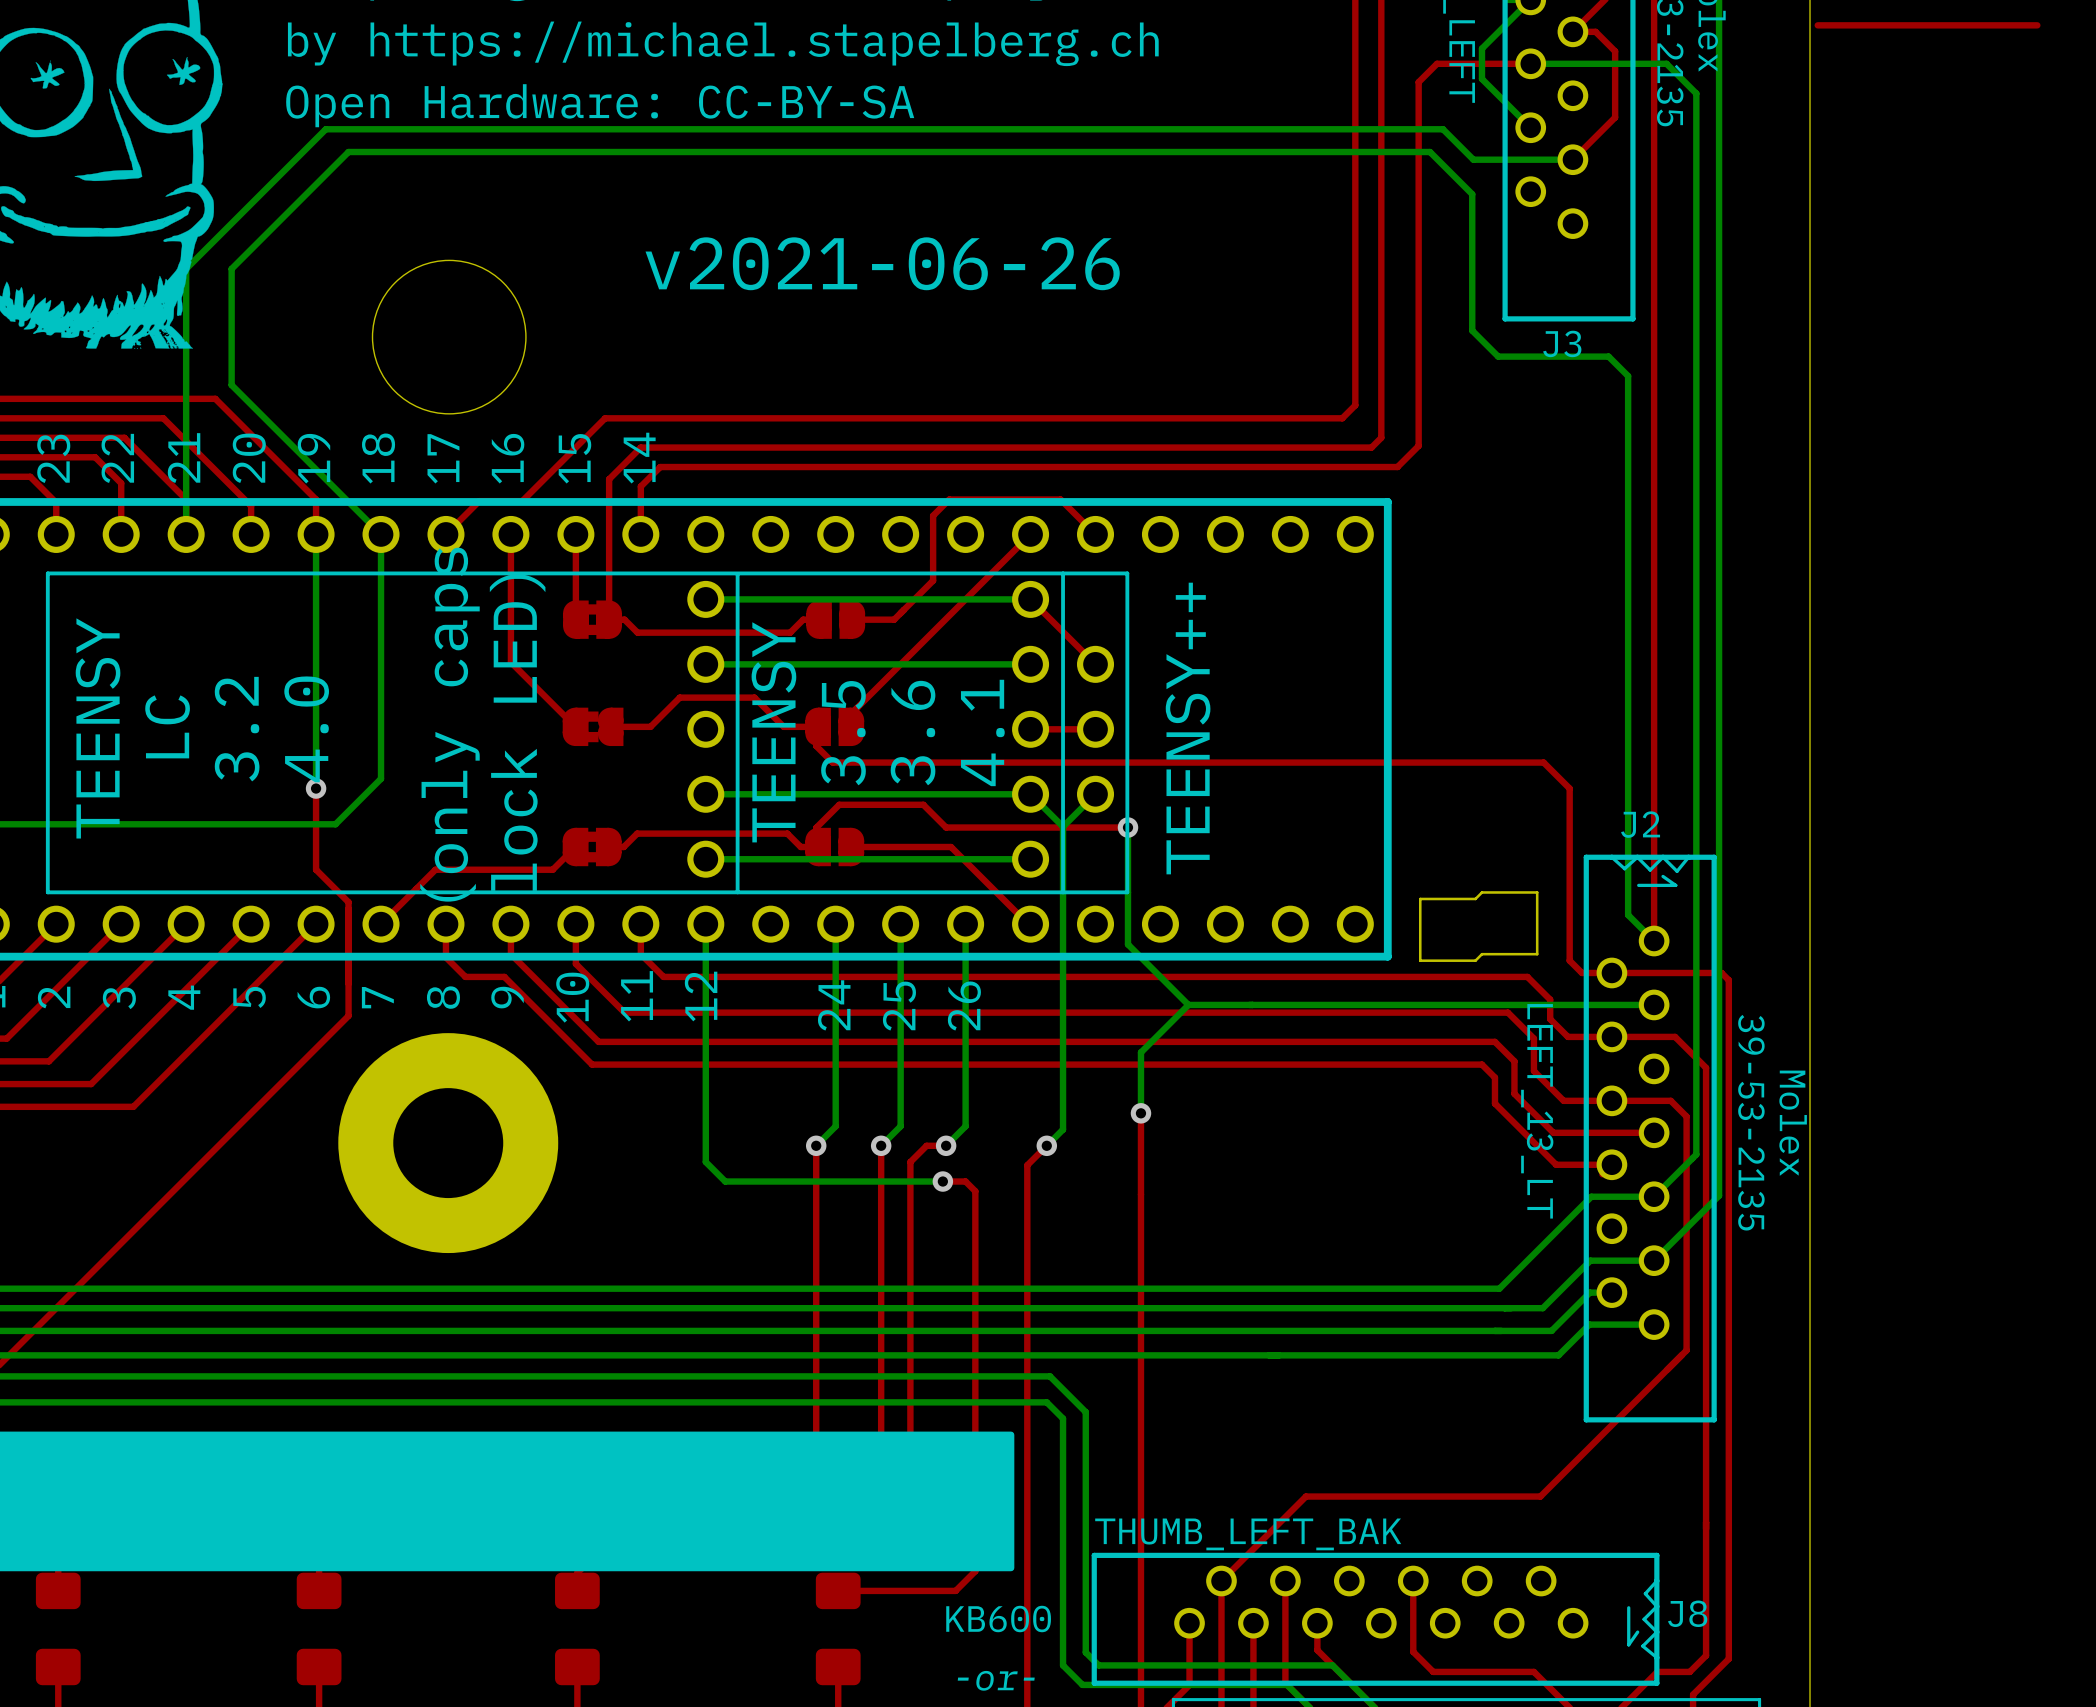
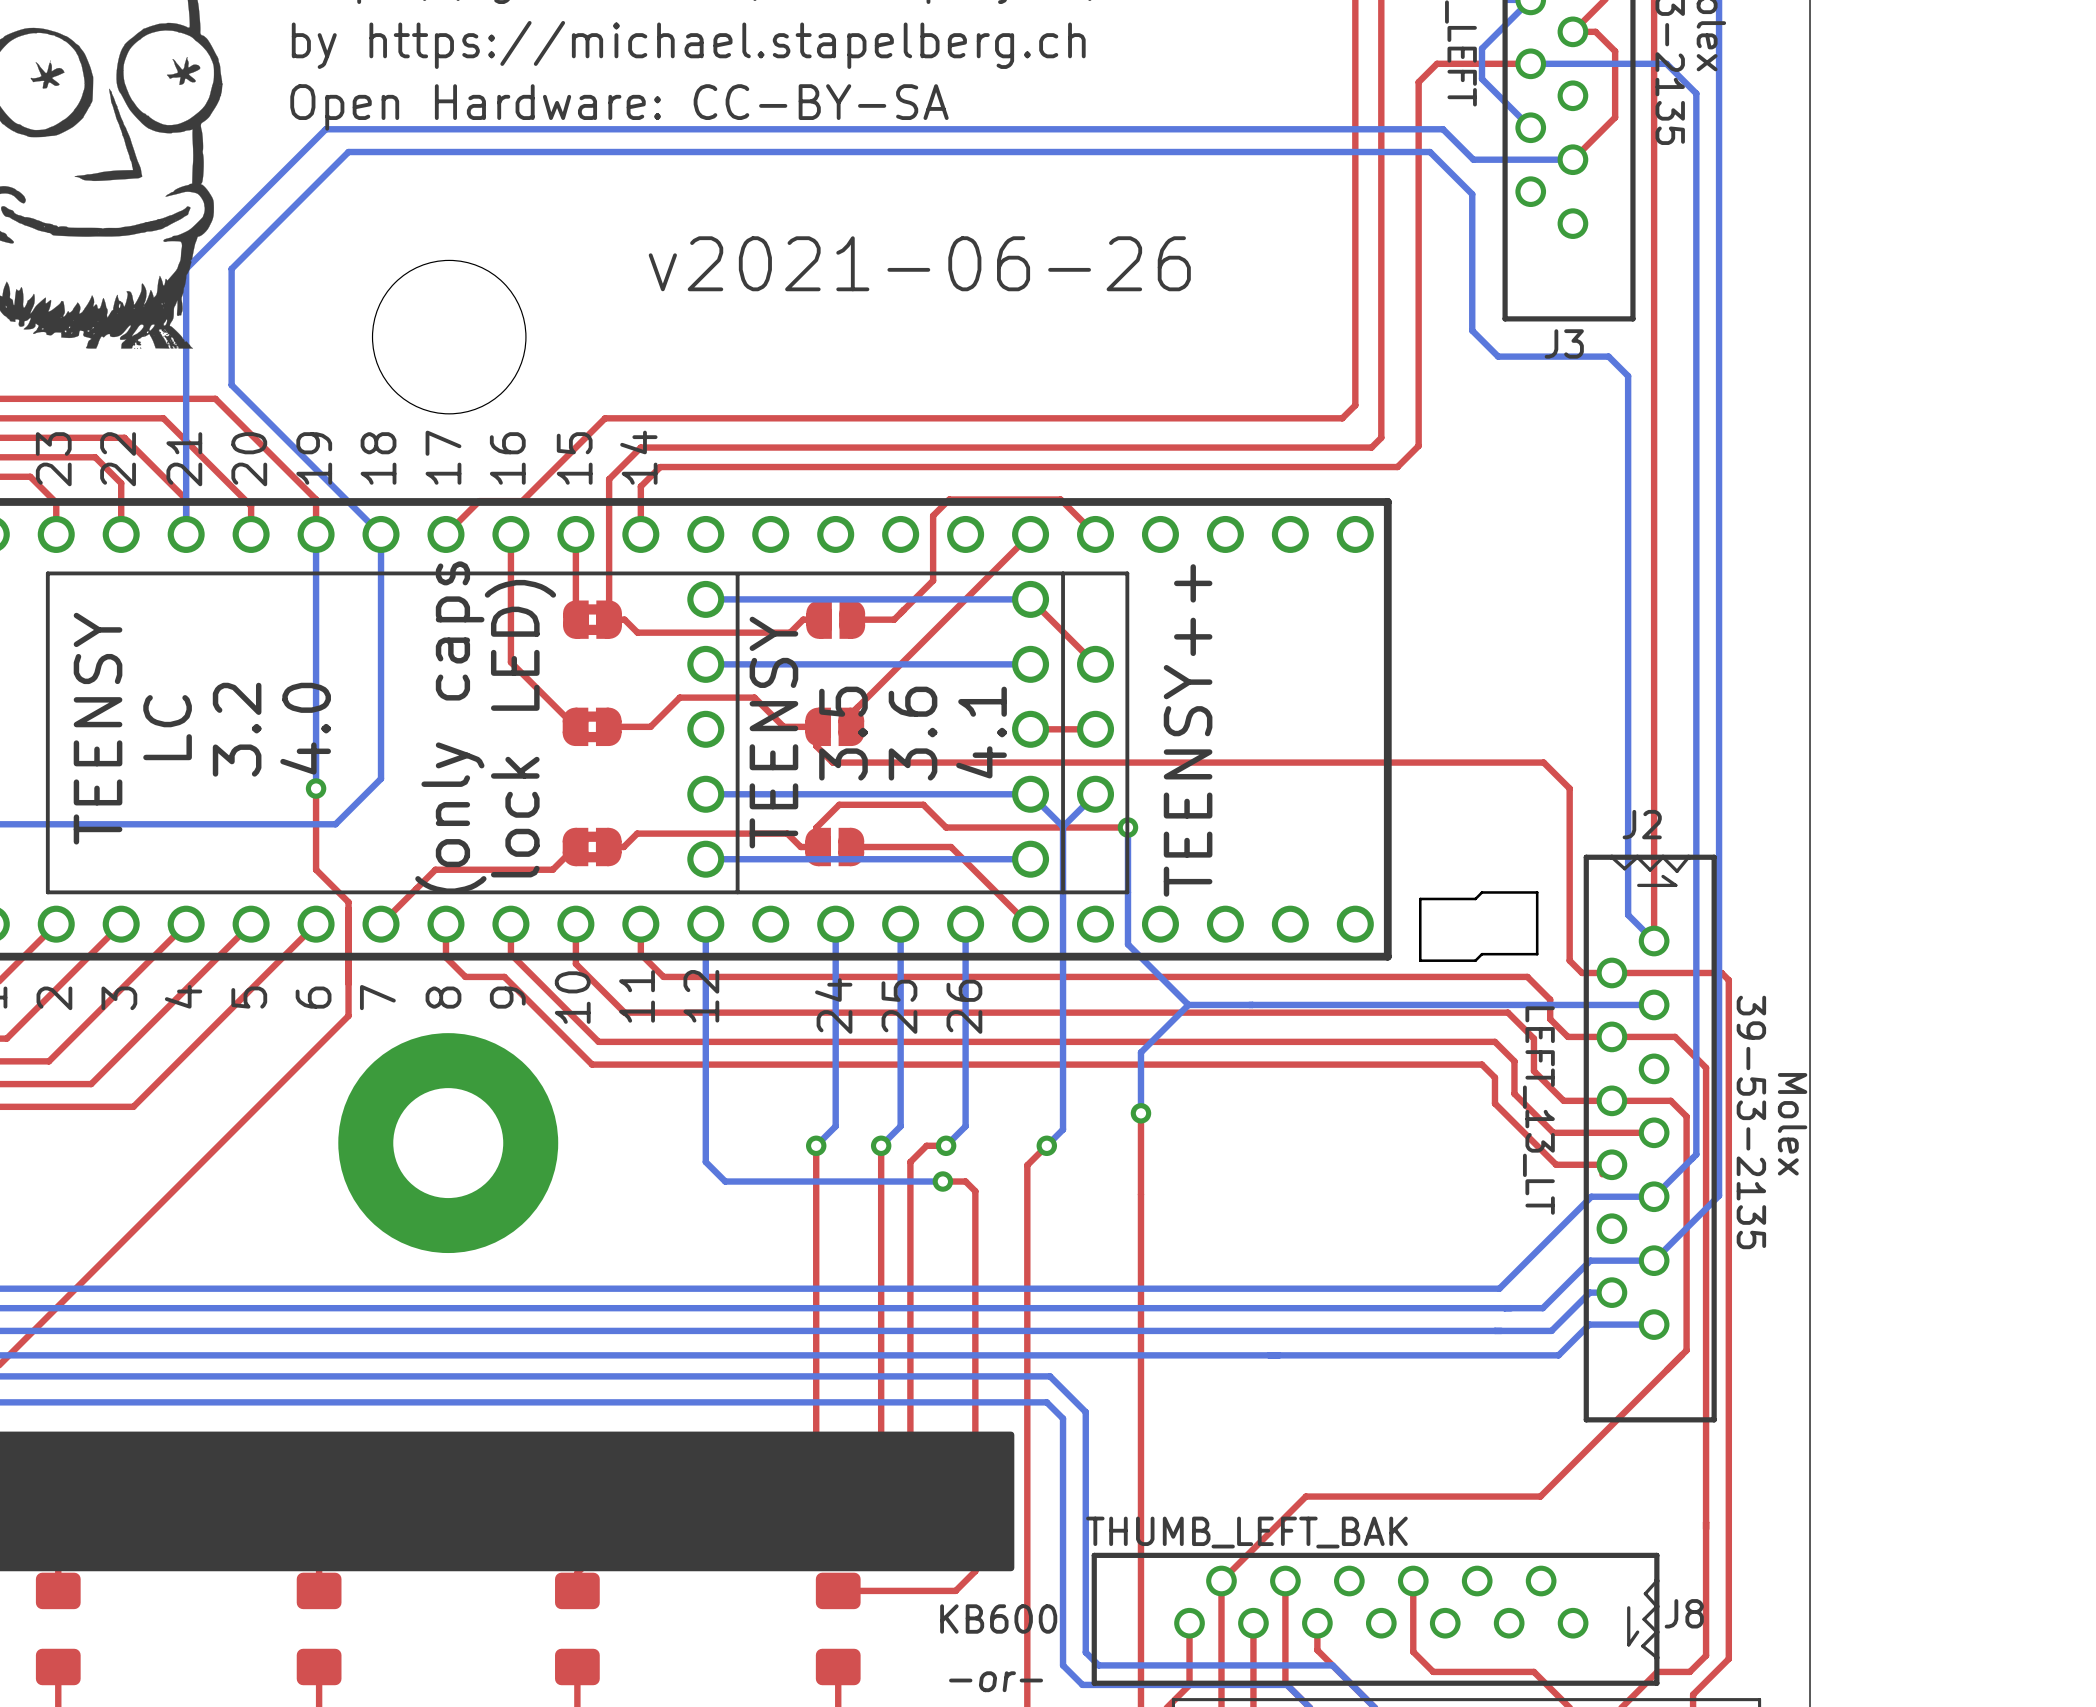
top track: (2037, 25) (1817, 25) -> none
part footprint: [562, 707, 624, 747] -> [562, 707, 622, 747]

